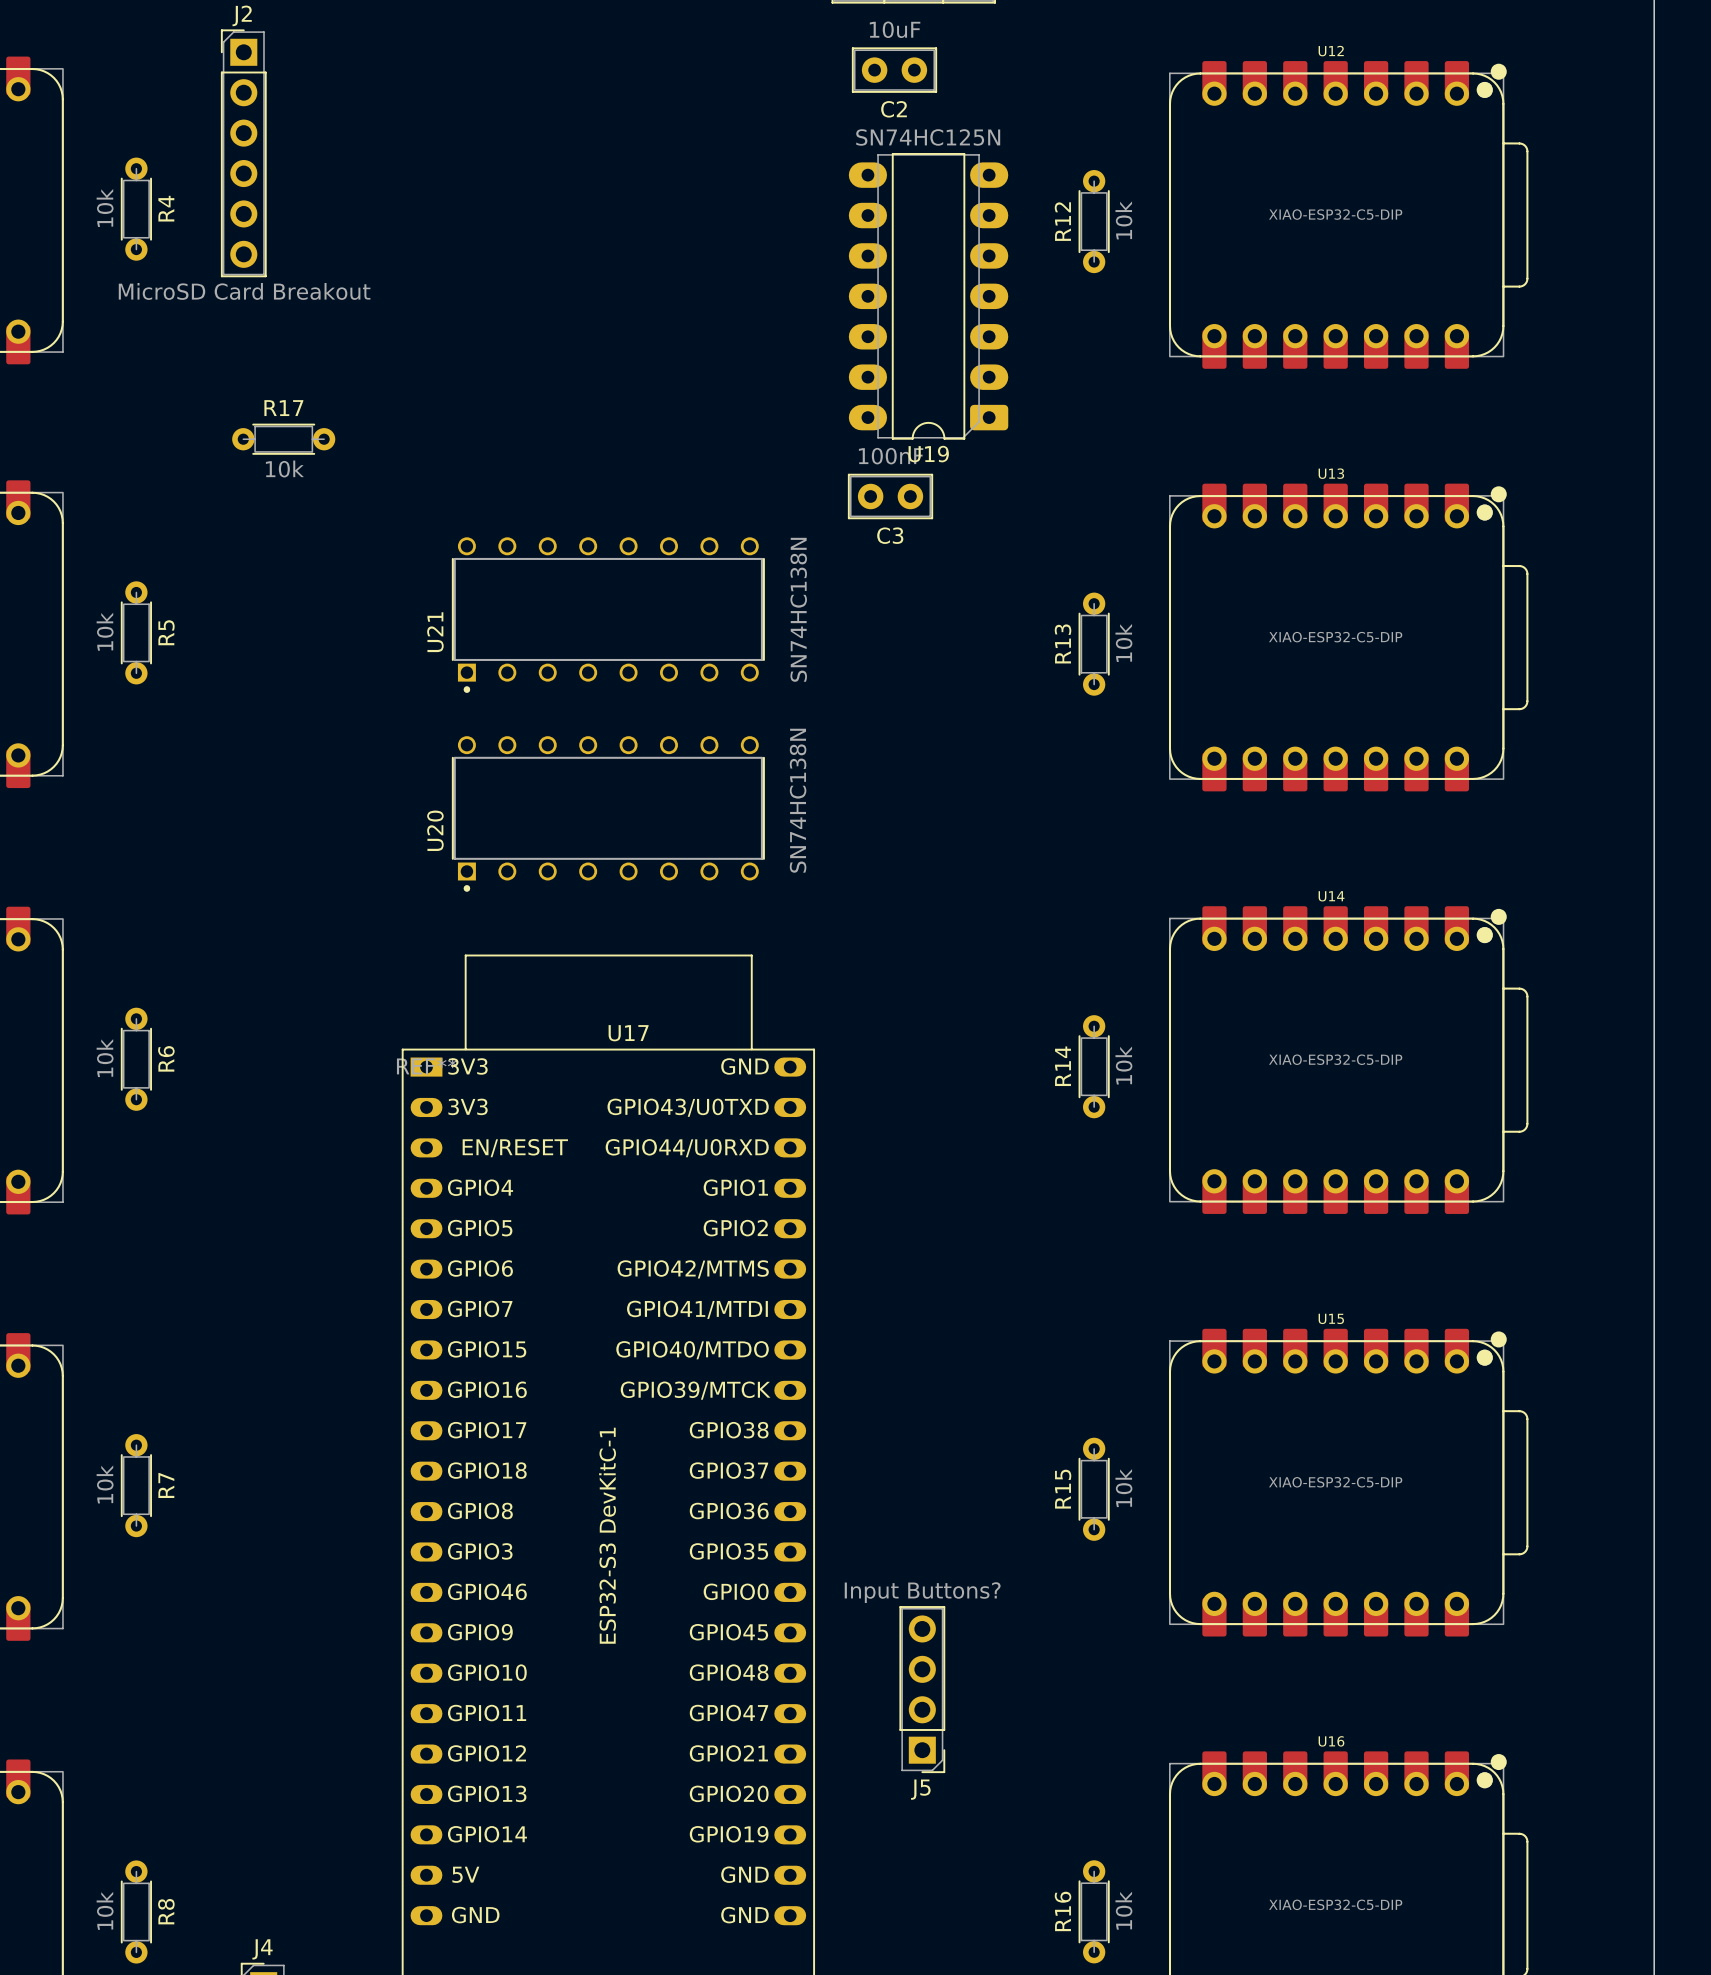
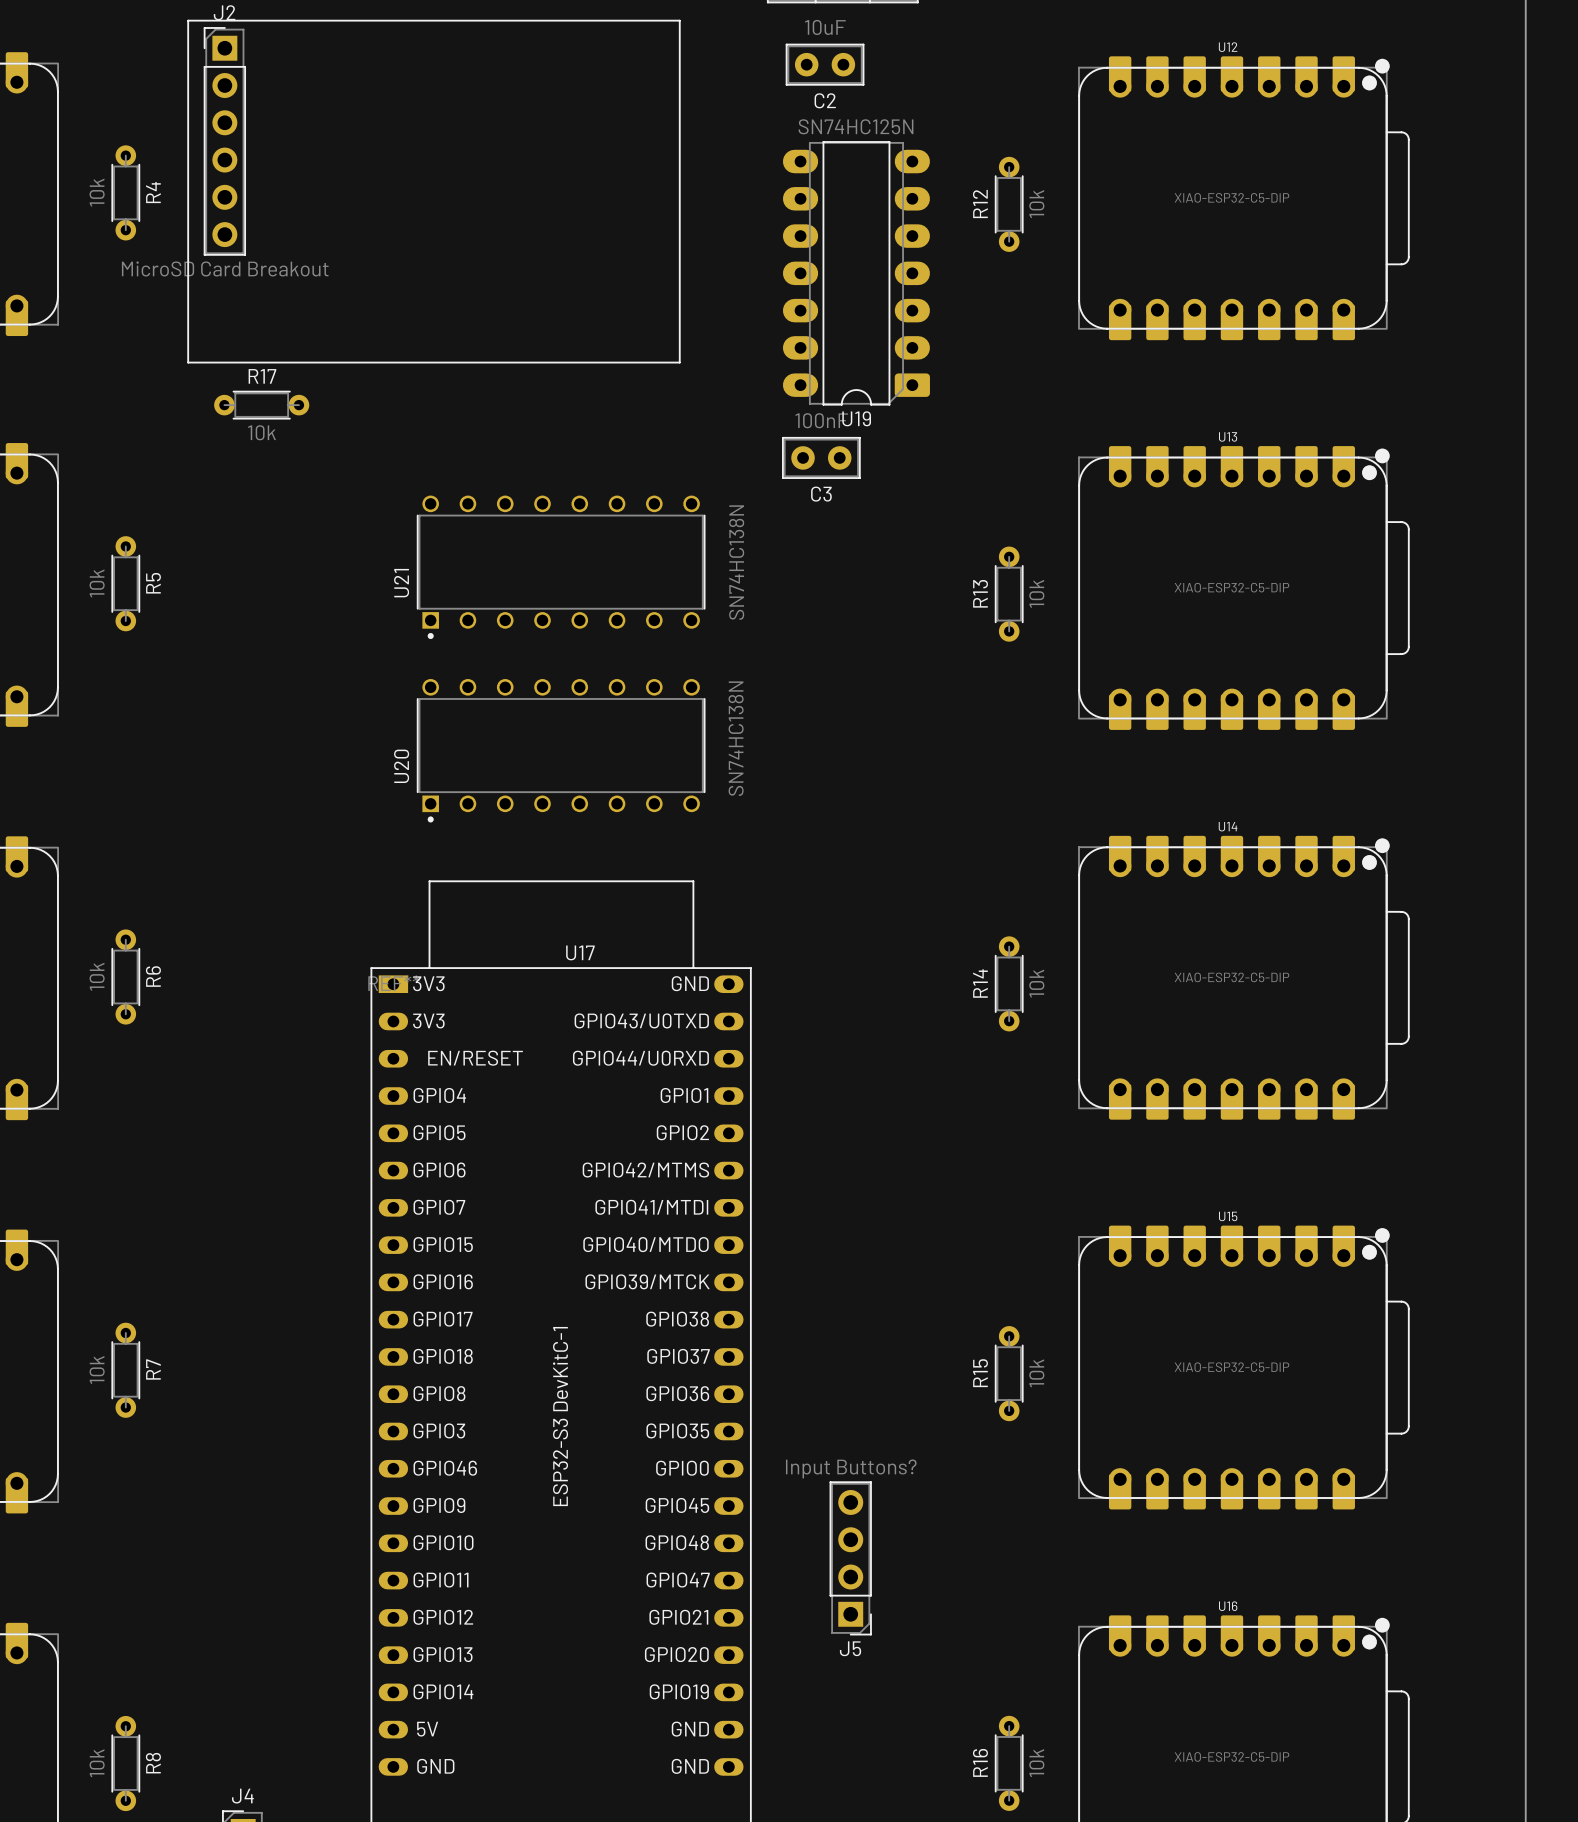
line: none -> (188, 20) (679, 20) (679, 362) (188, 362) (188, 20)

